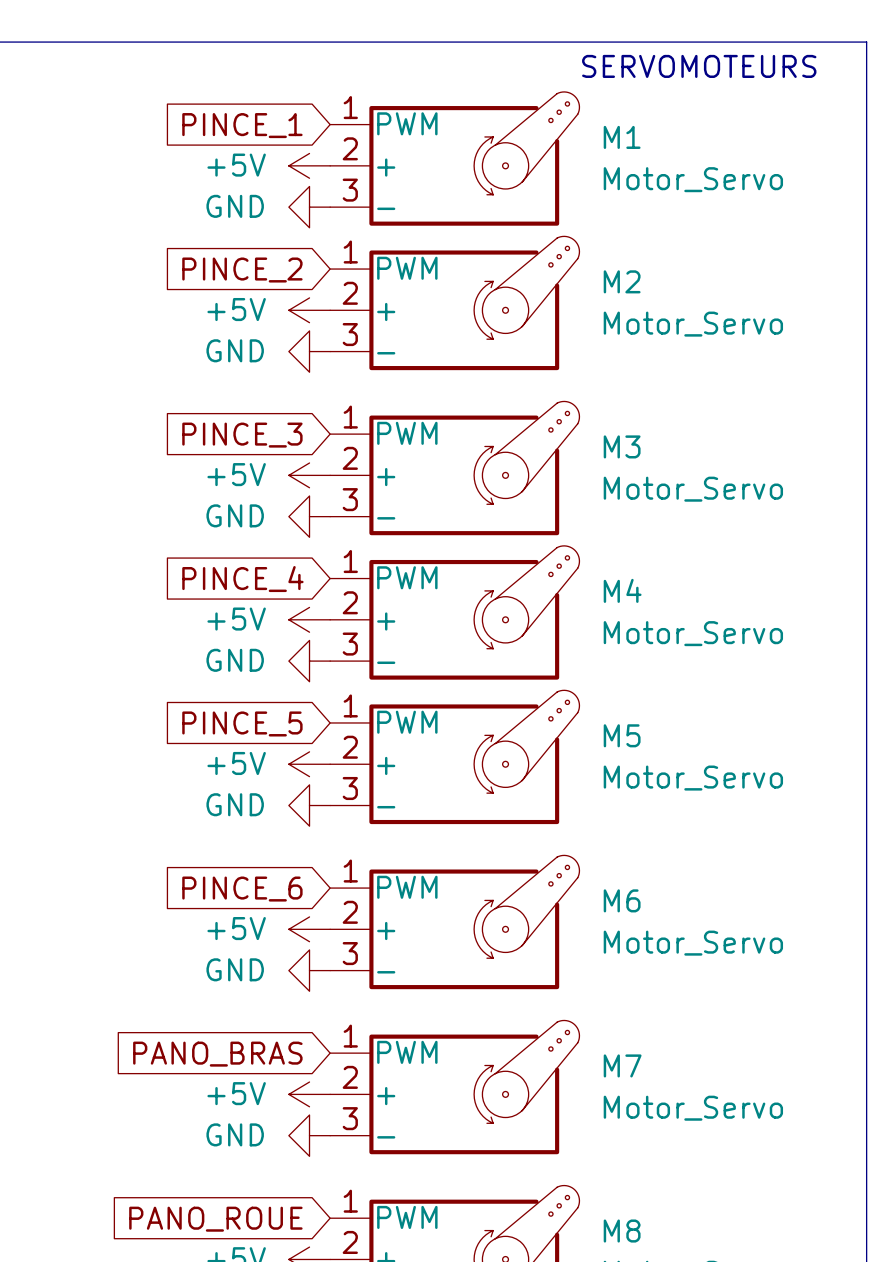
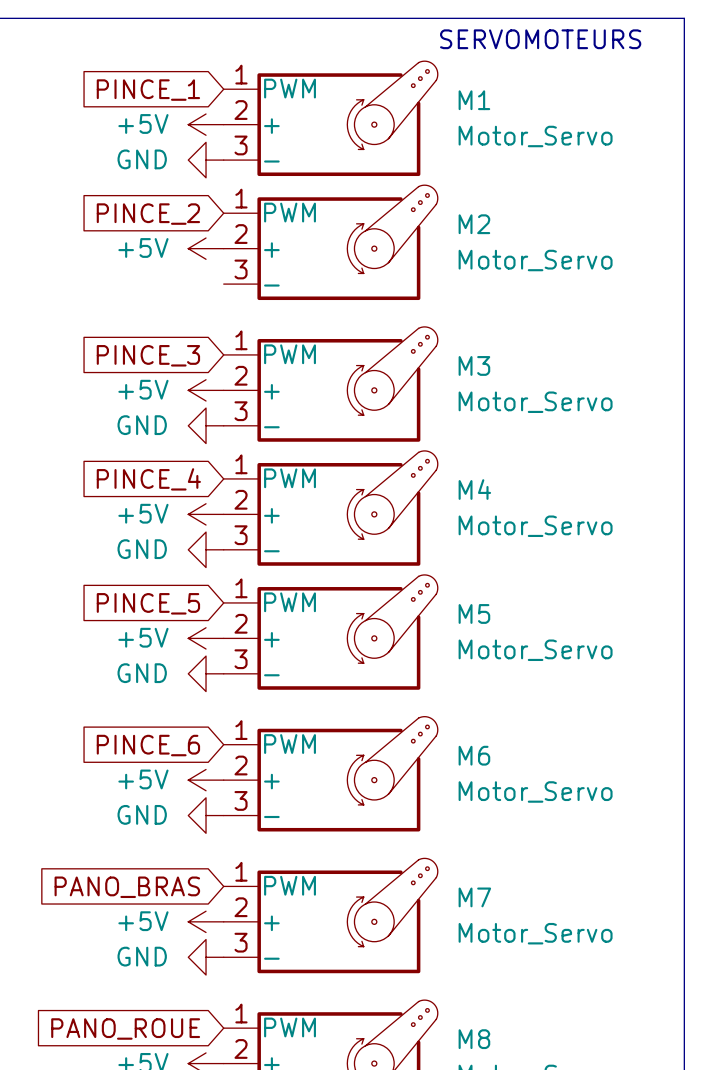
power symbol: GND (309, 351) -> none

